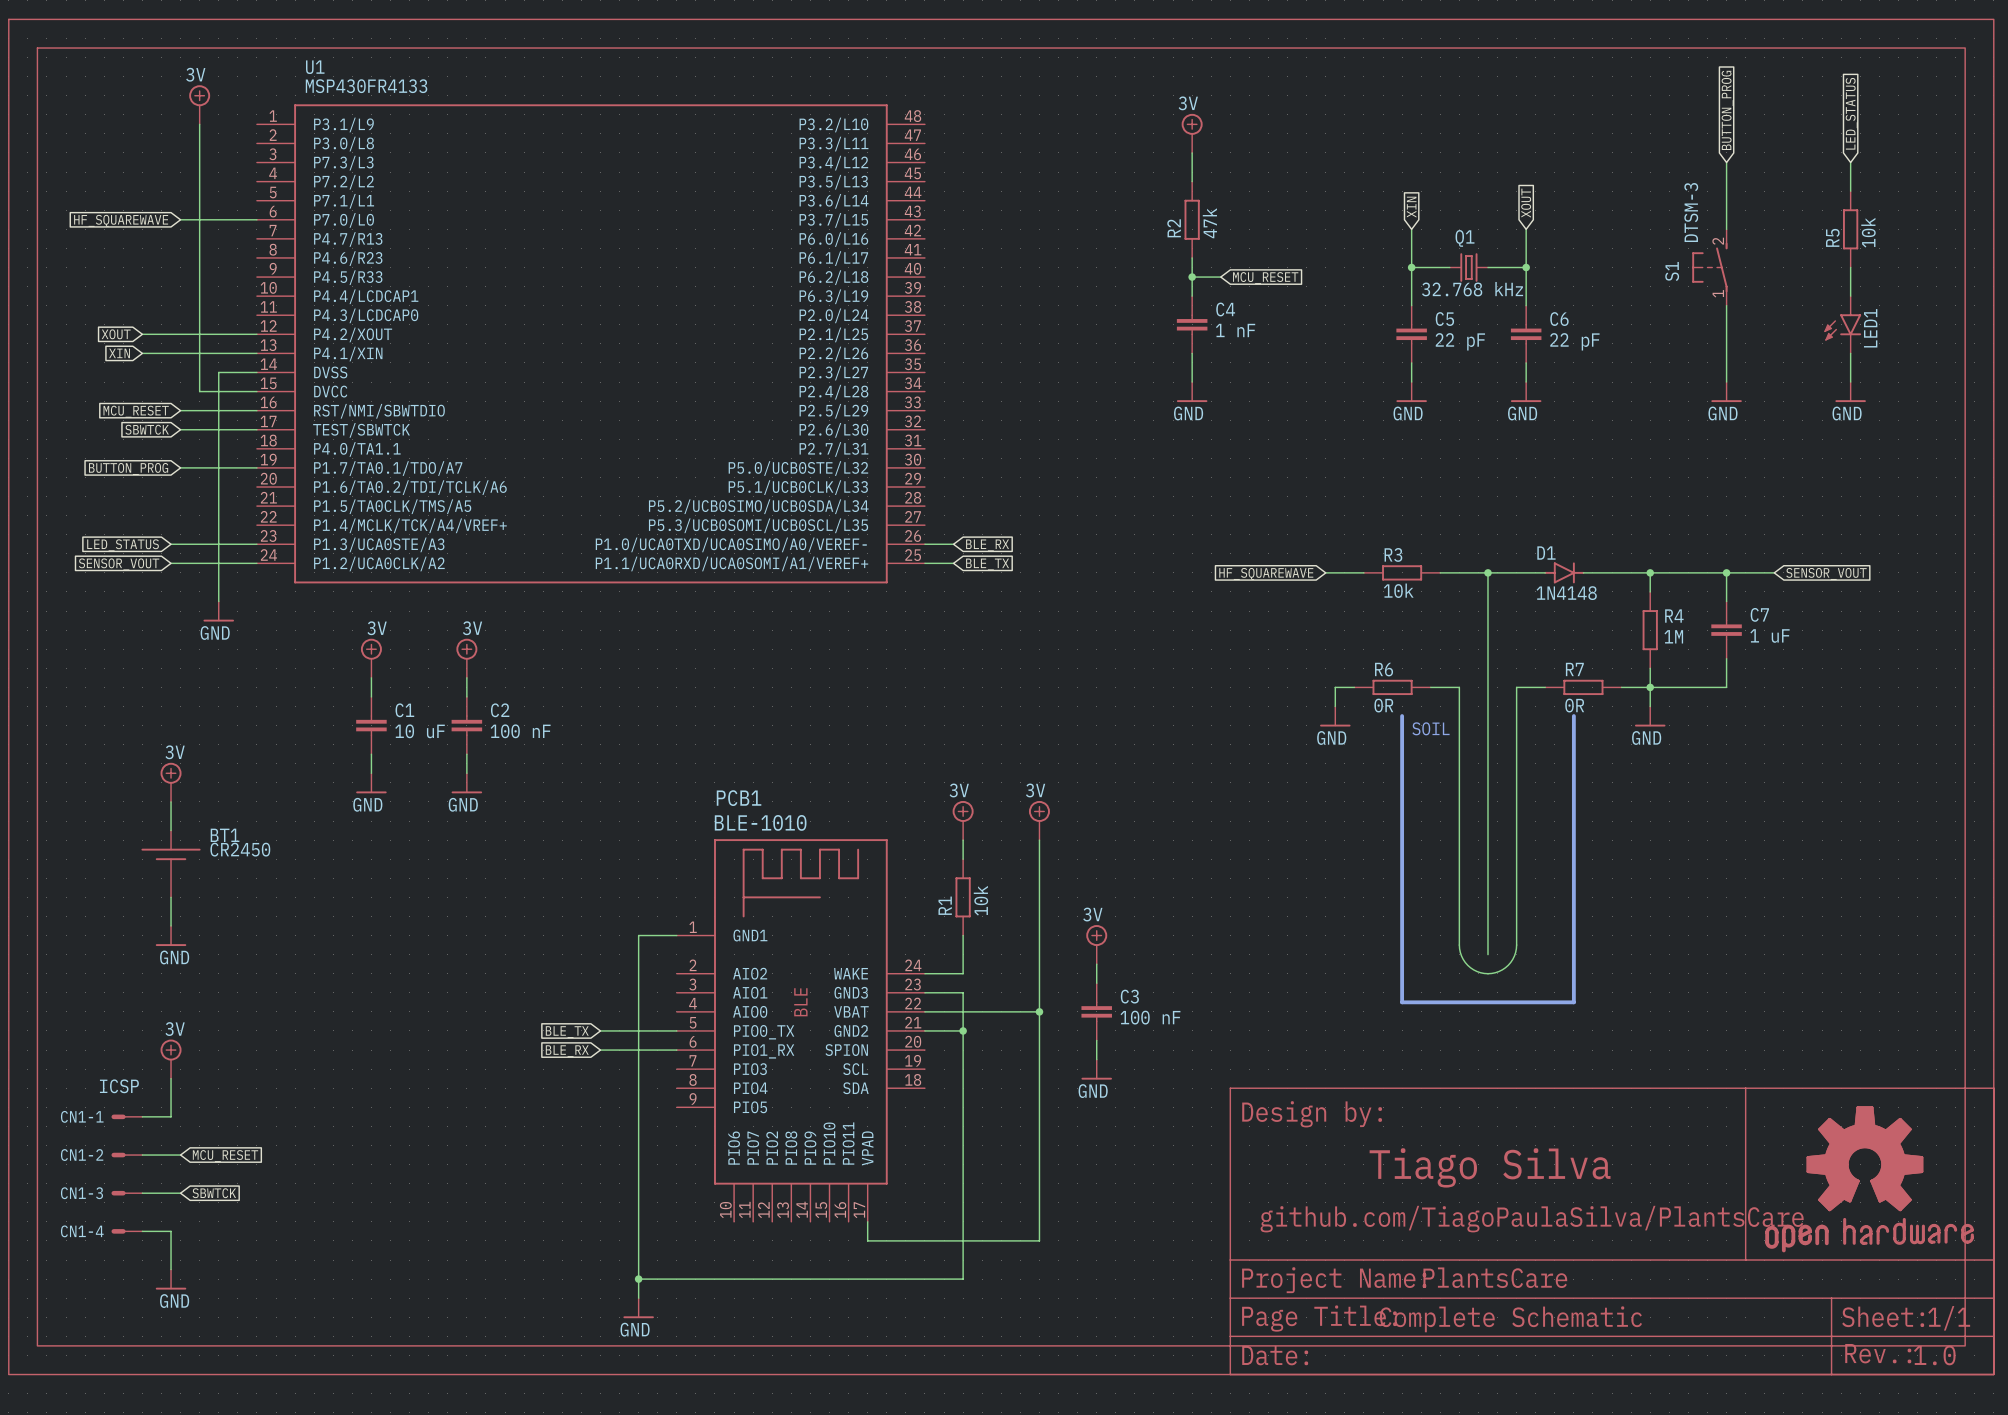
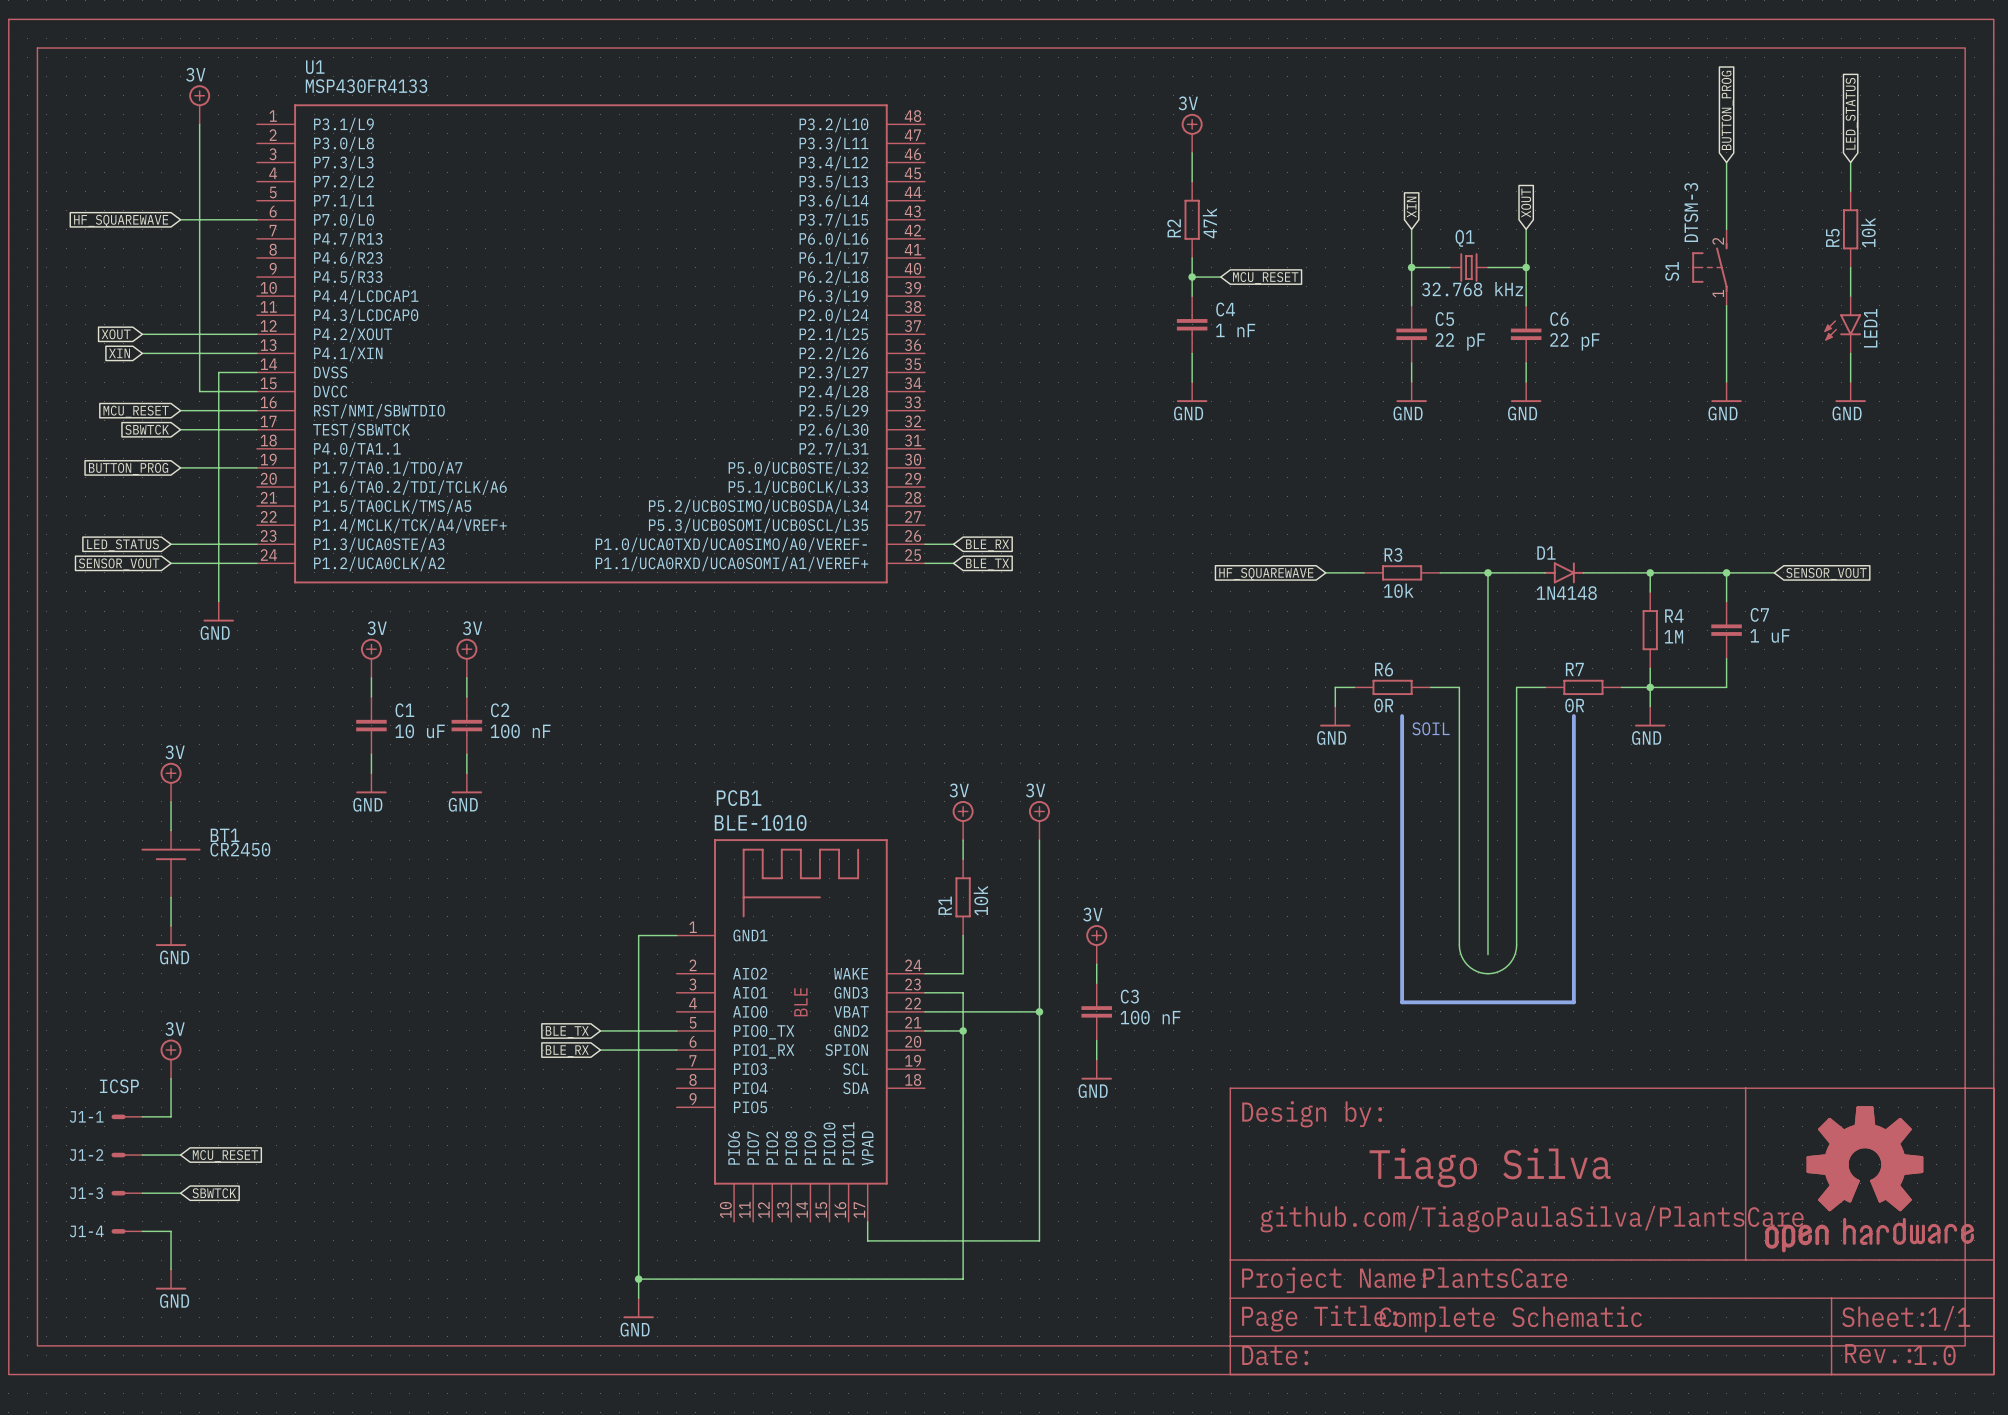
CN1-1 name: CN1-1 (82, 1116) -> J1-1 (86, 1116)
CN1-2 name: CN1-2 (82, 1155) -> J1-2 (86, 1155)
CN1-3 name: CN1-3 (81, 1193) -> J1-3 (86, 1193)
CN1-4 name: CN1-4 (82, 1231) -> J1-4 (86, 1231)

